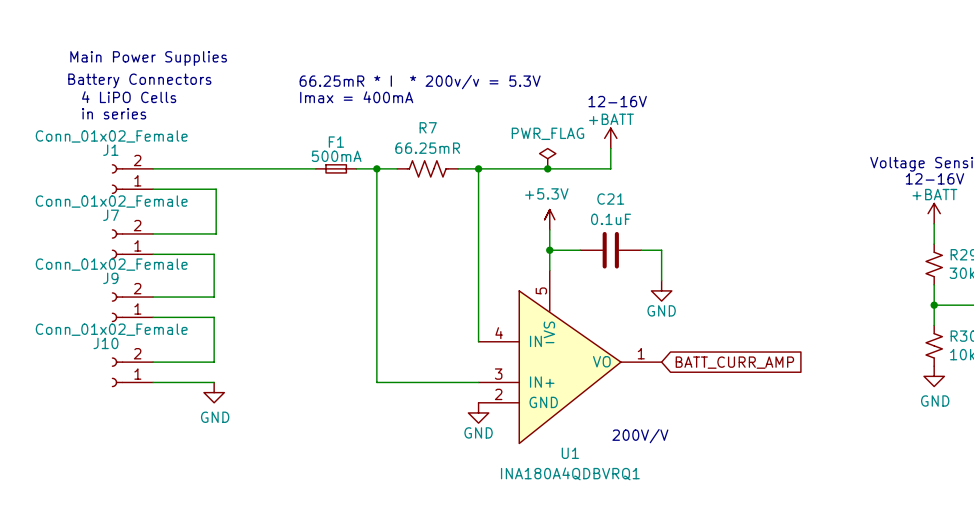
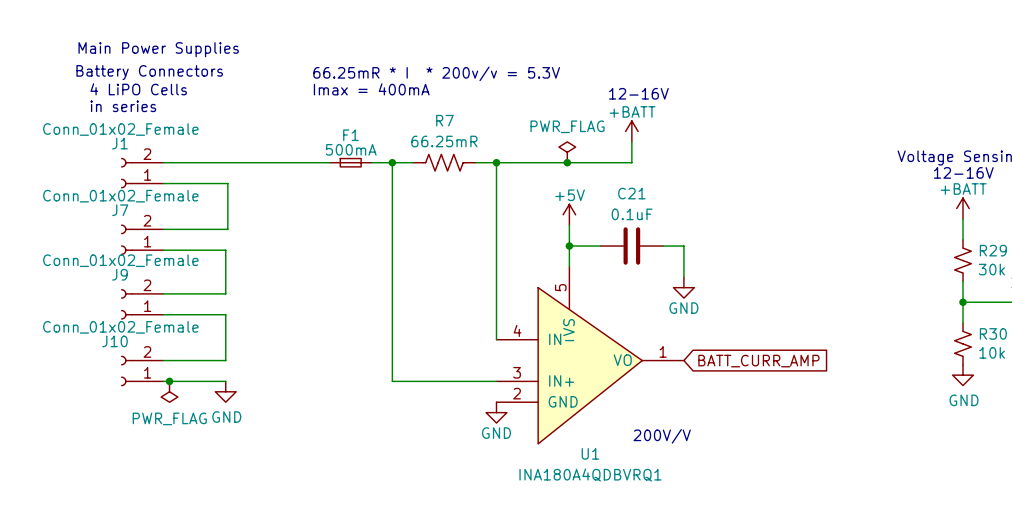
power symbol: +5.3V (549, 219) -> +5V (569, 214)
junction: none -> (169, 381)
power symbol: none -> PWR_FLAG (169, 391)

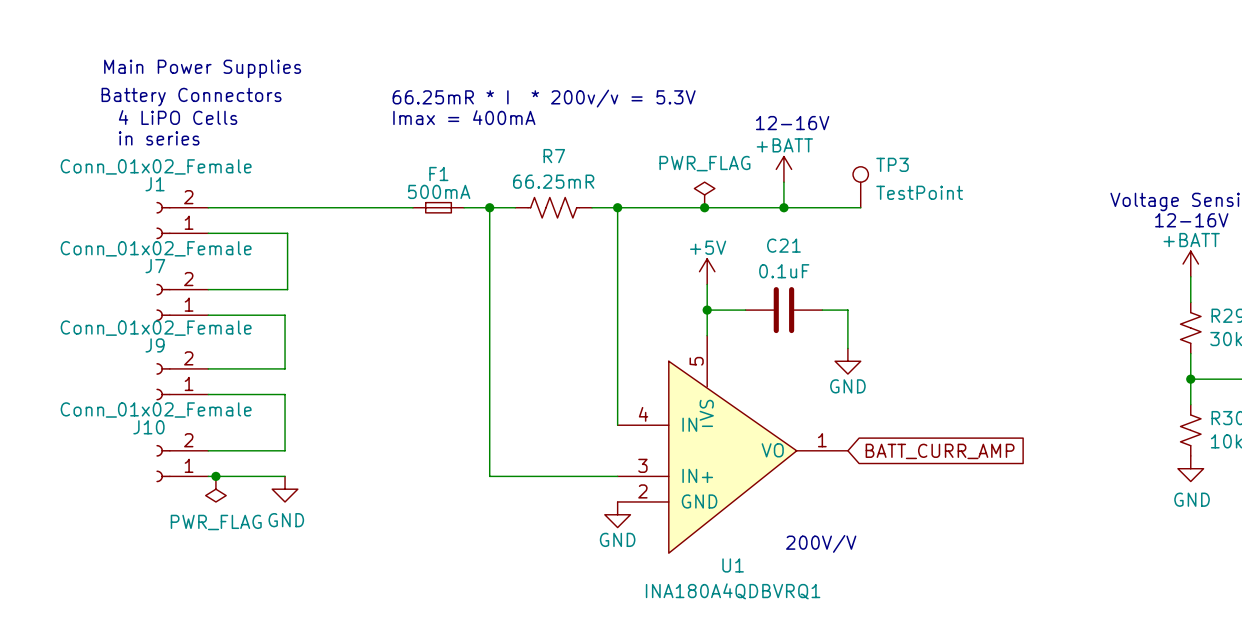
TP3: none -> TestPoint (860, 187)
wire: none -> (783, 207) (860, 207)
junction: none -> (783, 207)

